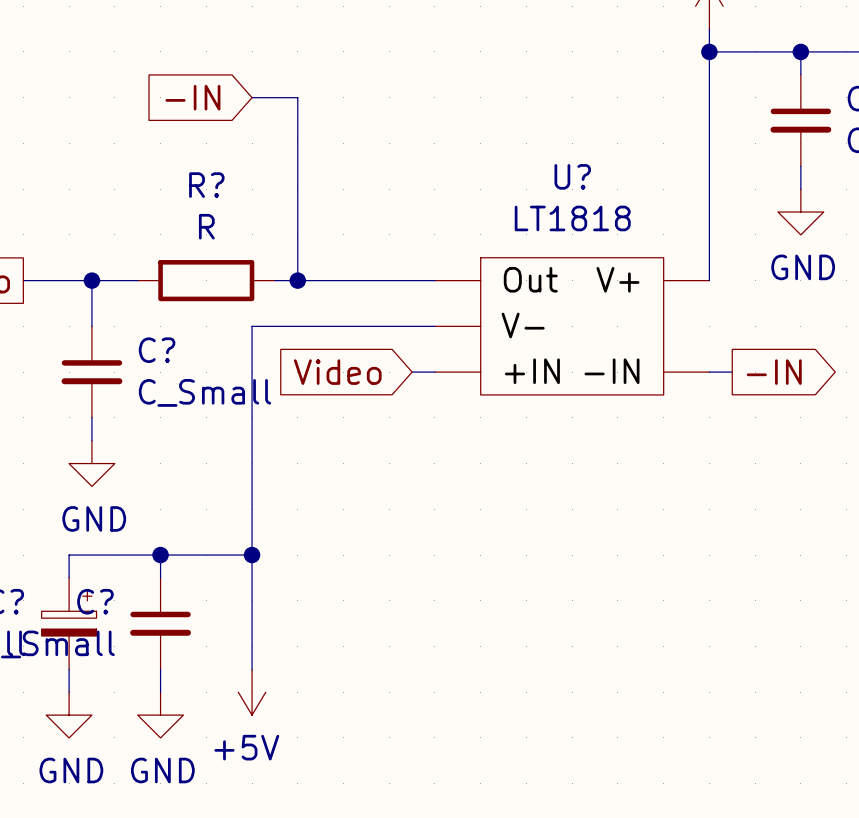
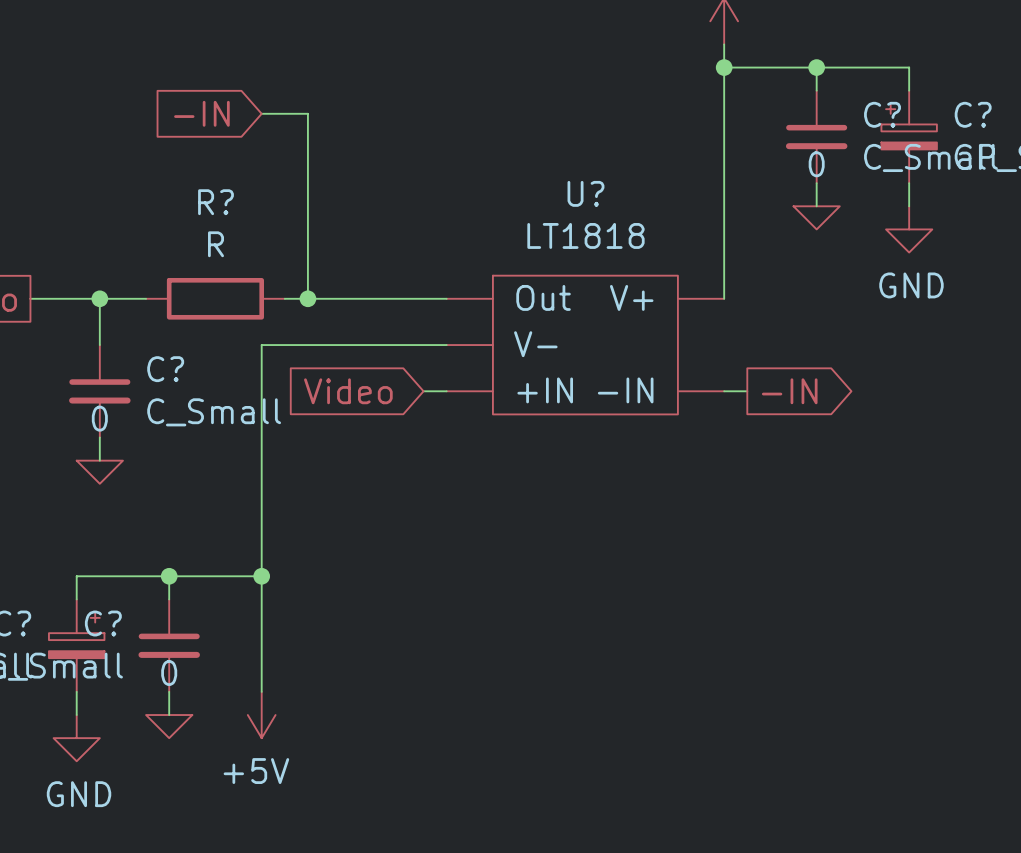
power symbol: GND (800, 212) -> 0 (816, 217)
power symbol: GND (91, 463) -> 0 (99, 472)
power symbol: GND (160, 715) -> 0 (169, 726)

